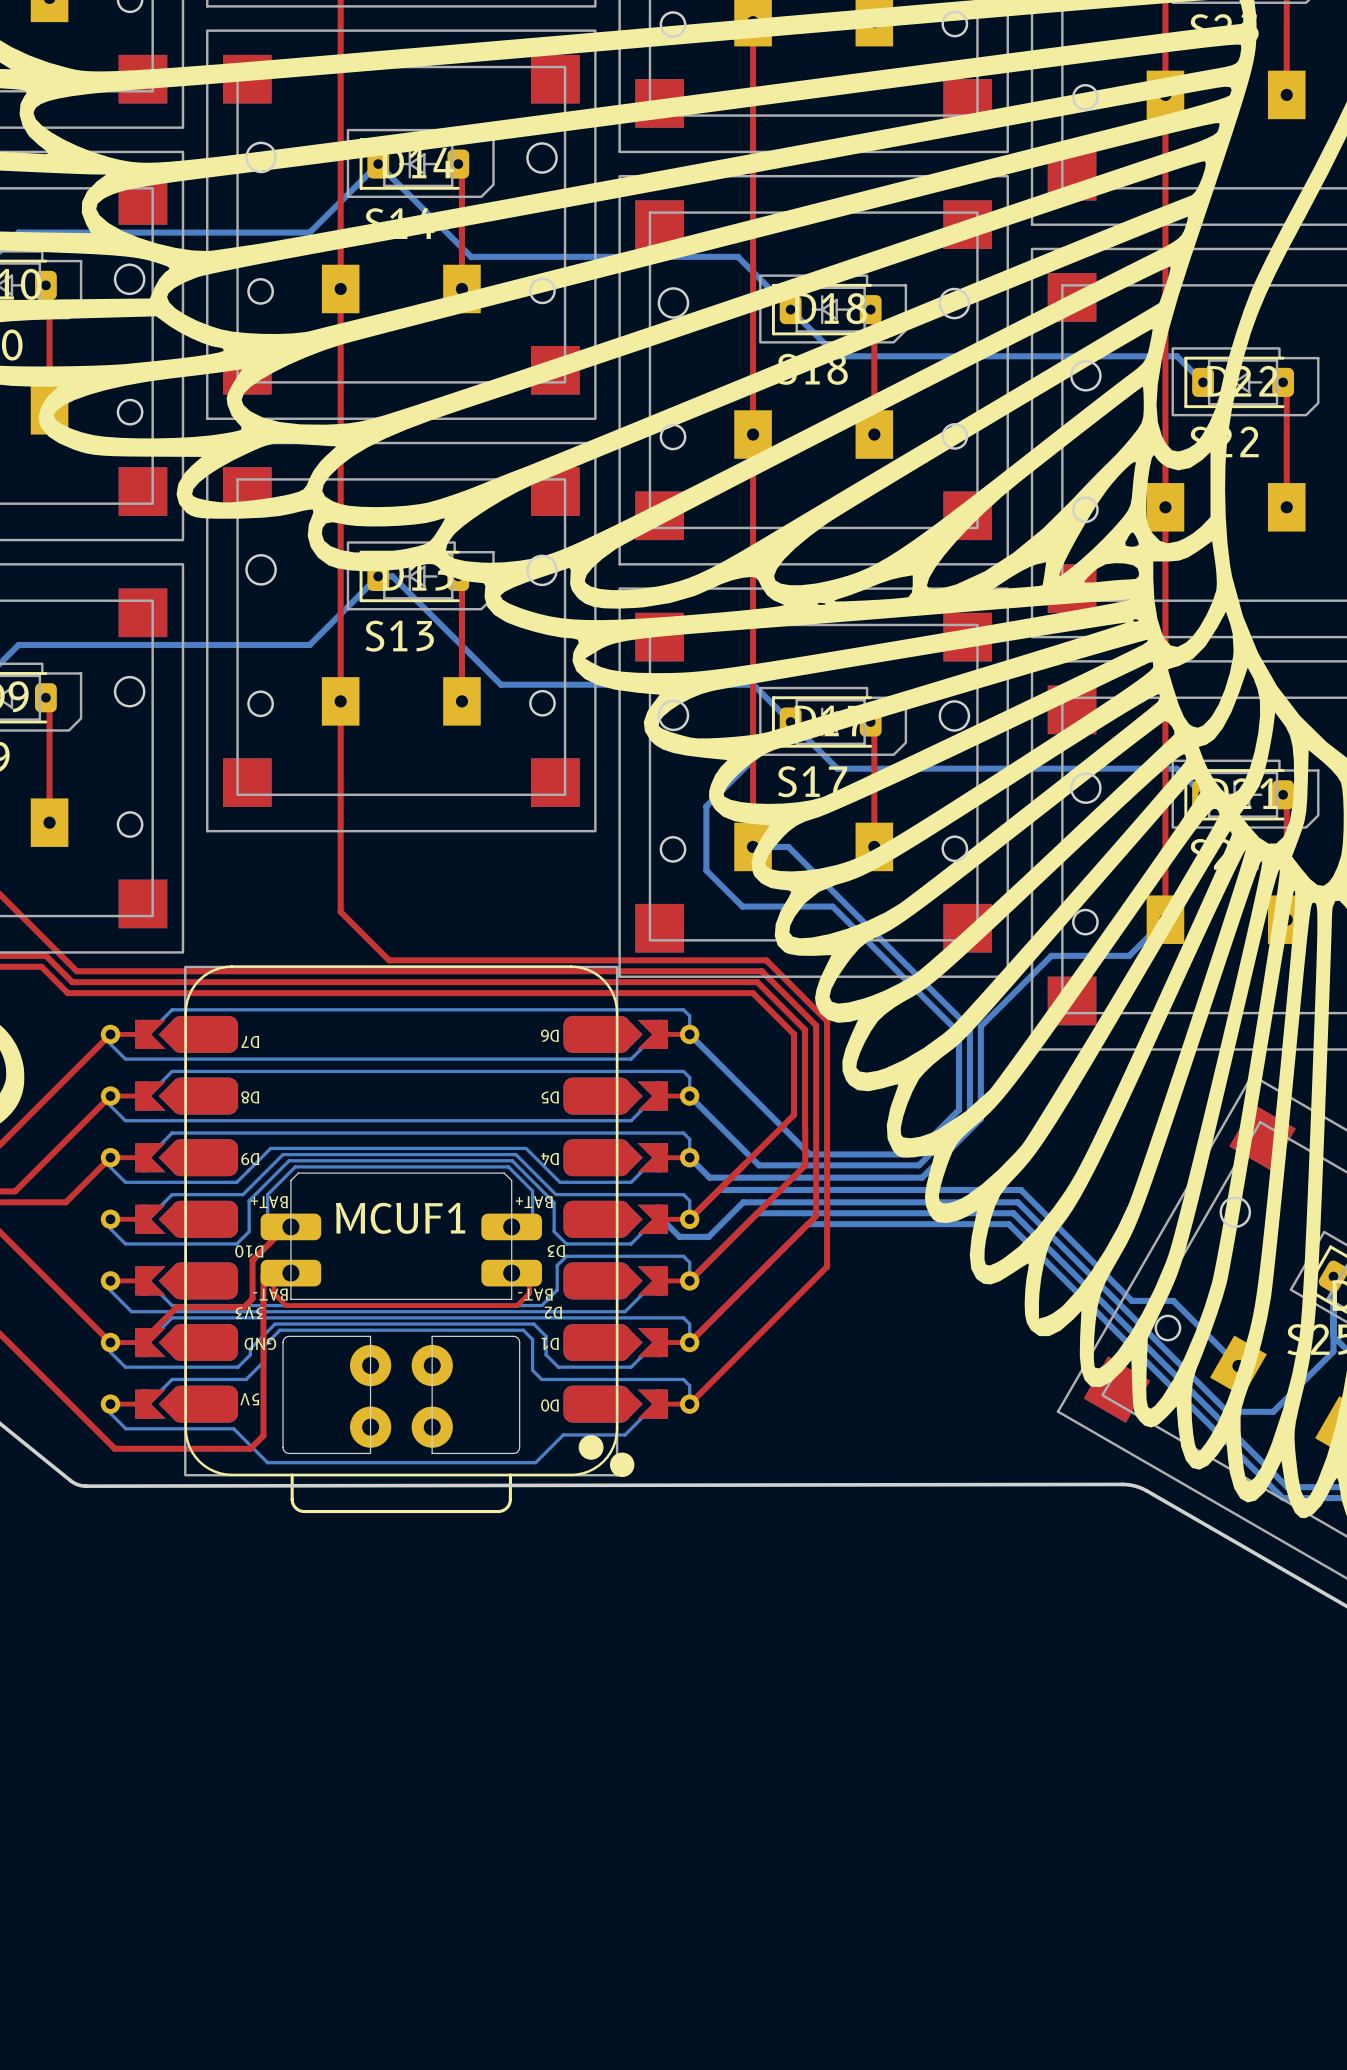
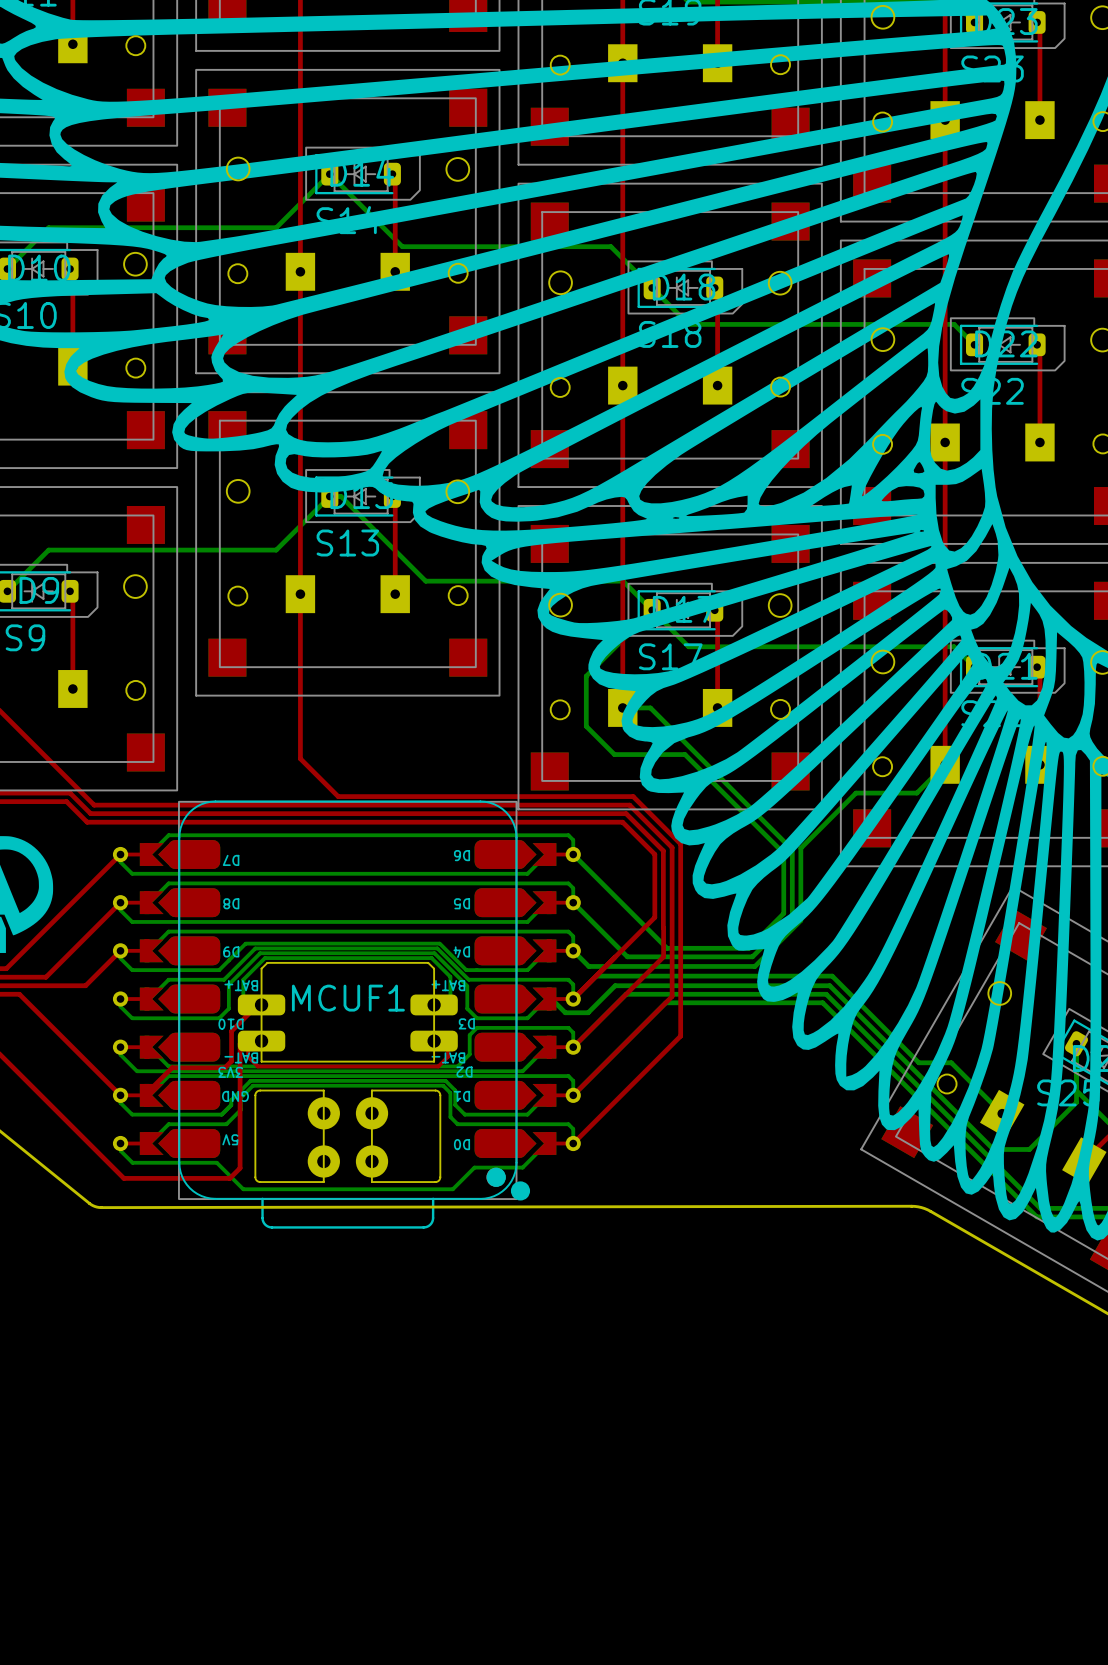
MCUF1 footprint: [100, 965, 700, 1514] -> [112, 800, 581, 1229]

